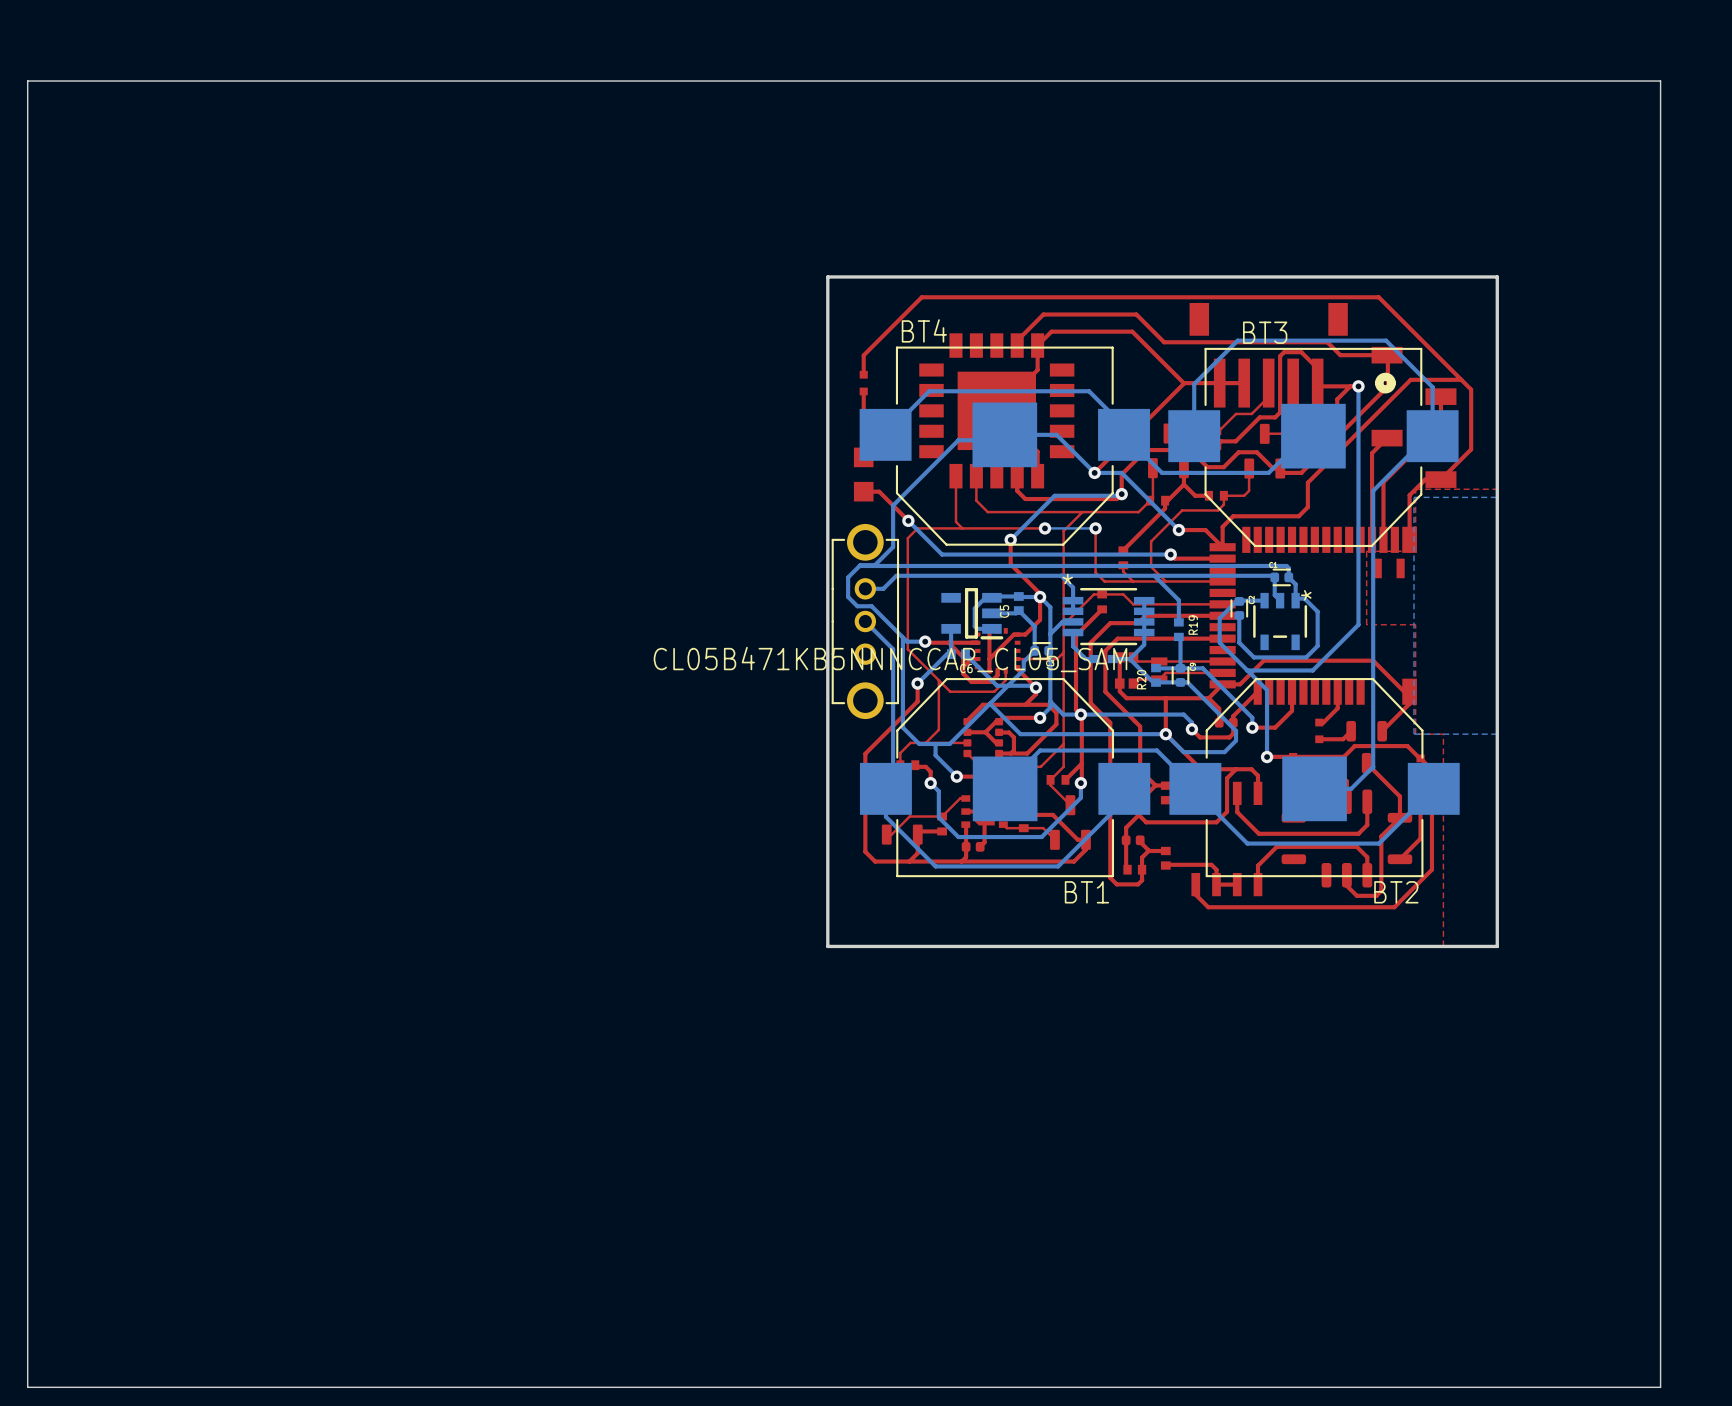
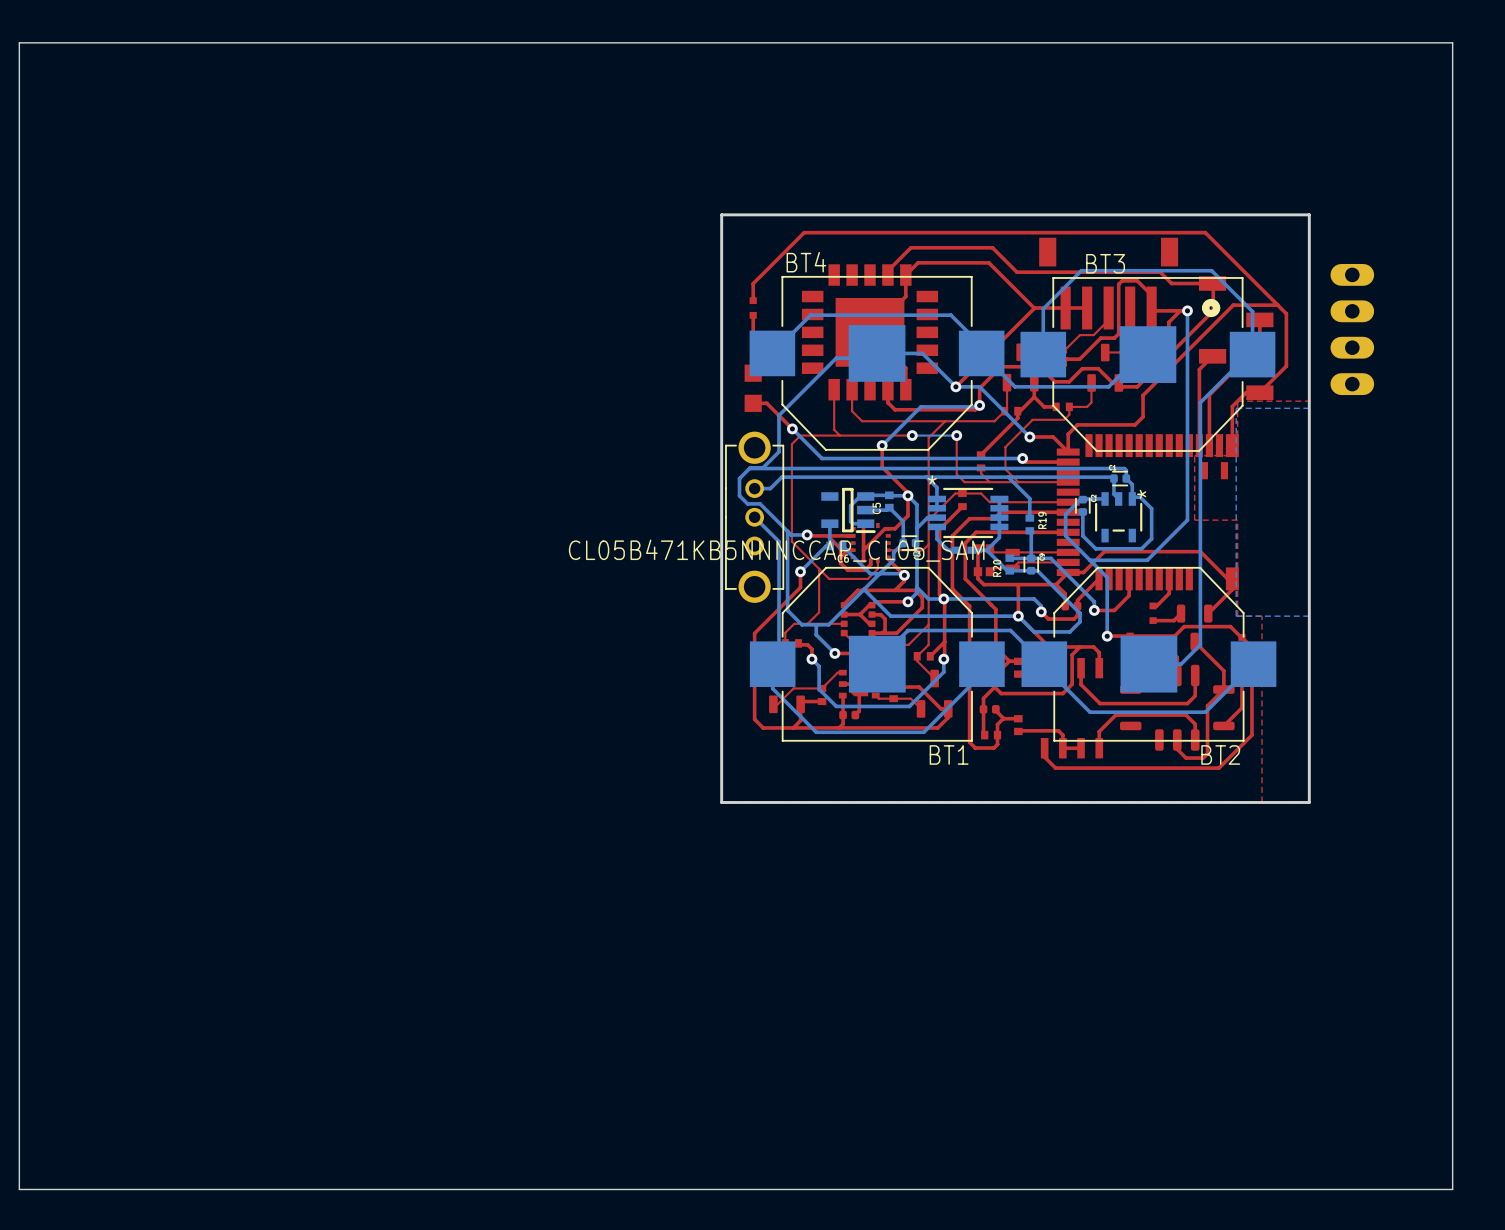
part: none -> (1352, 329)

